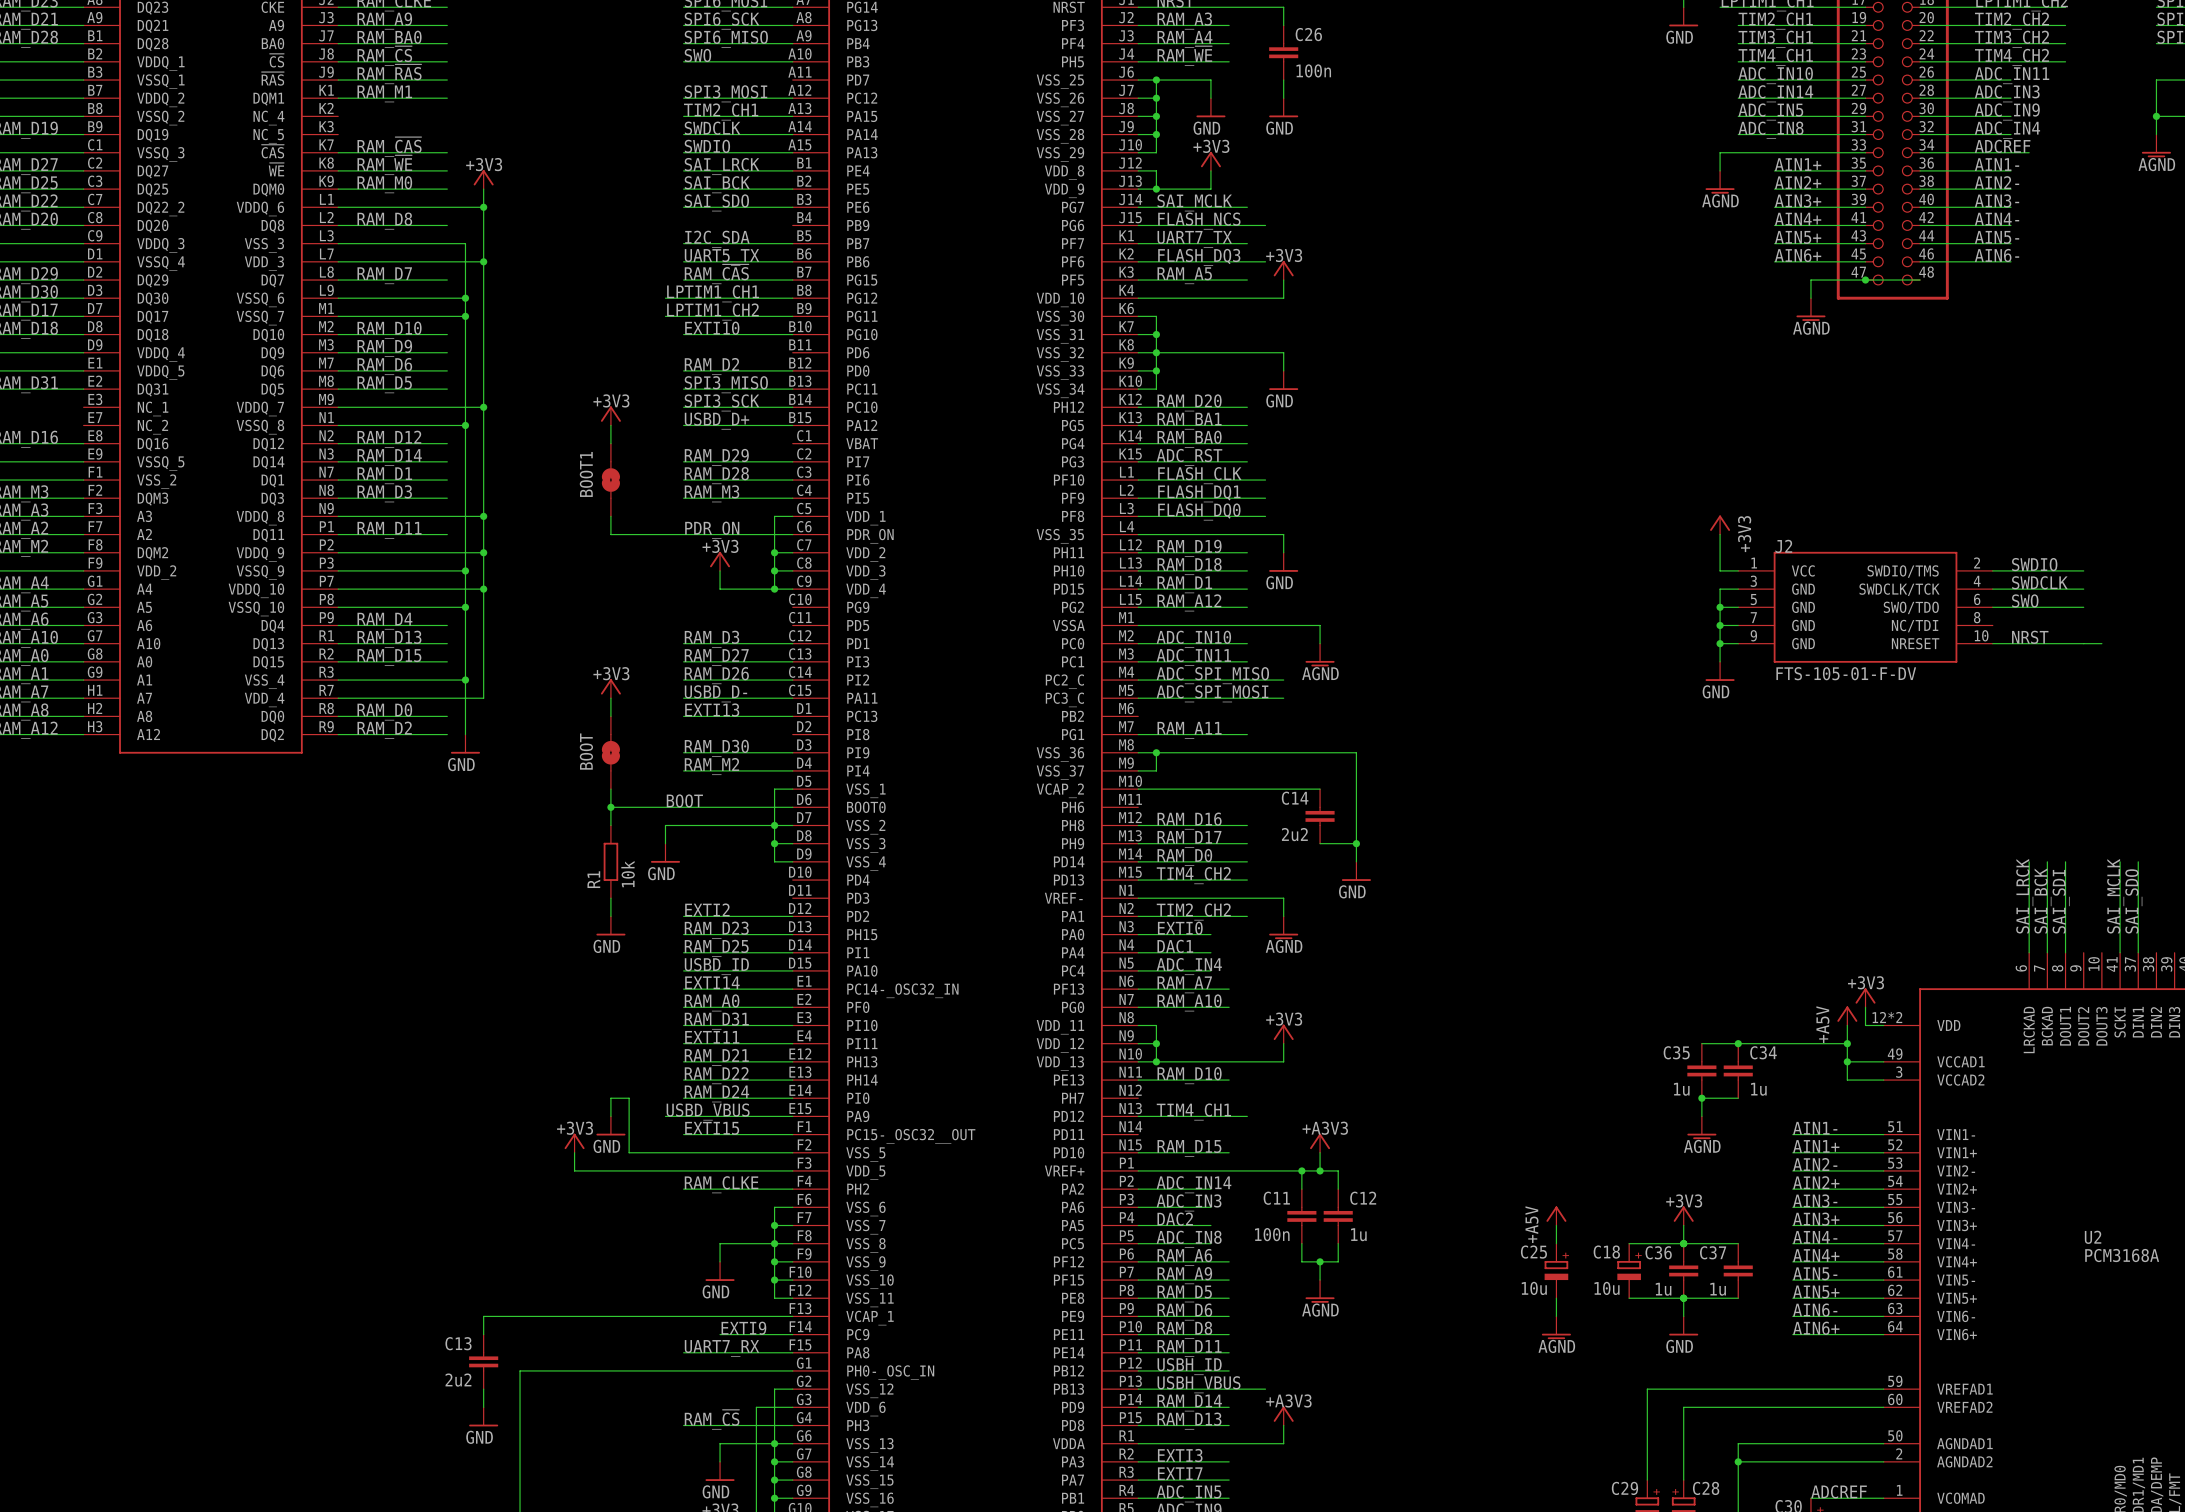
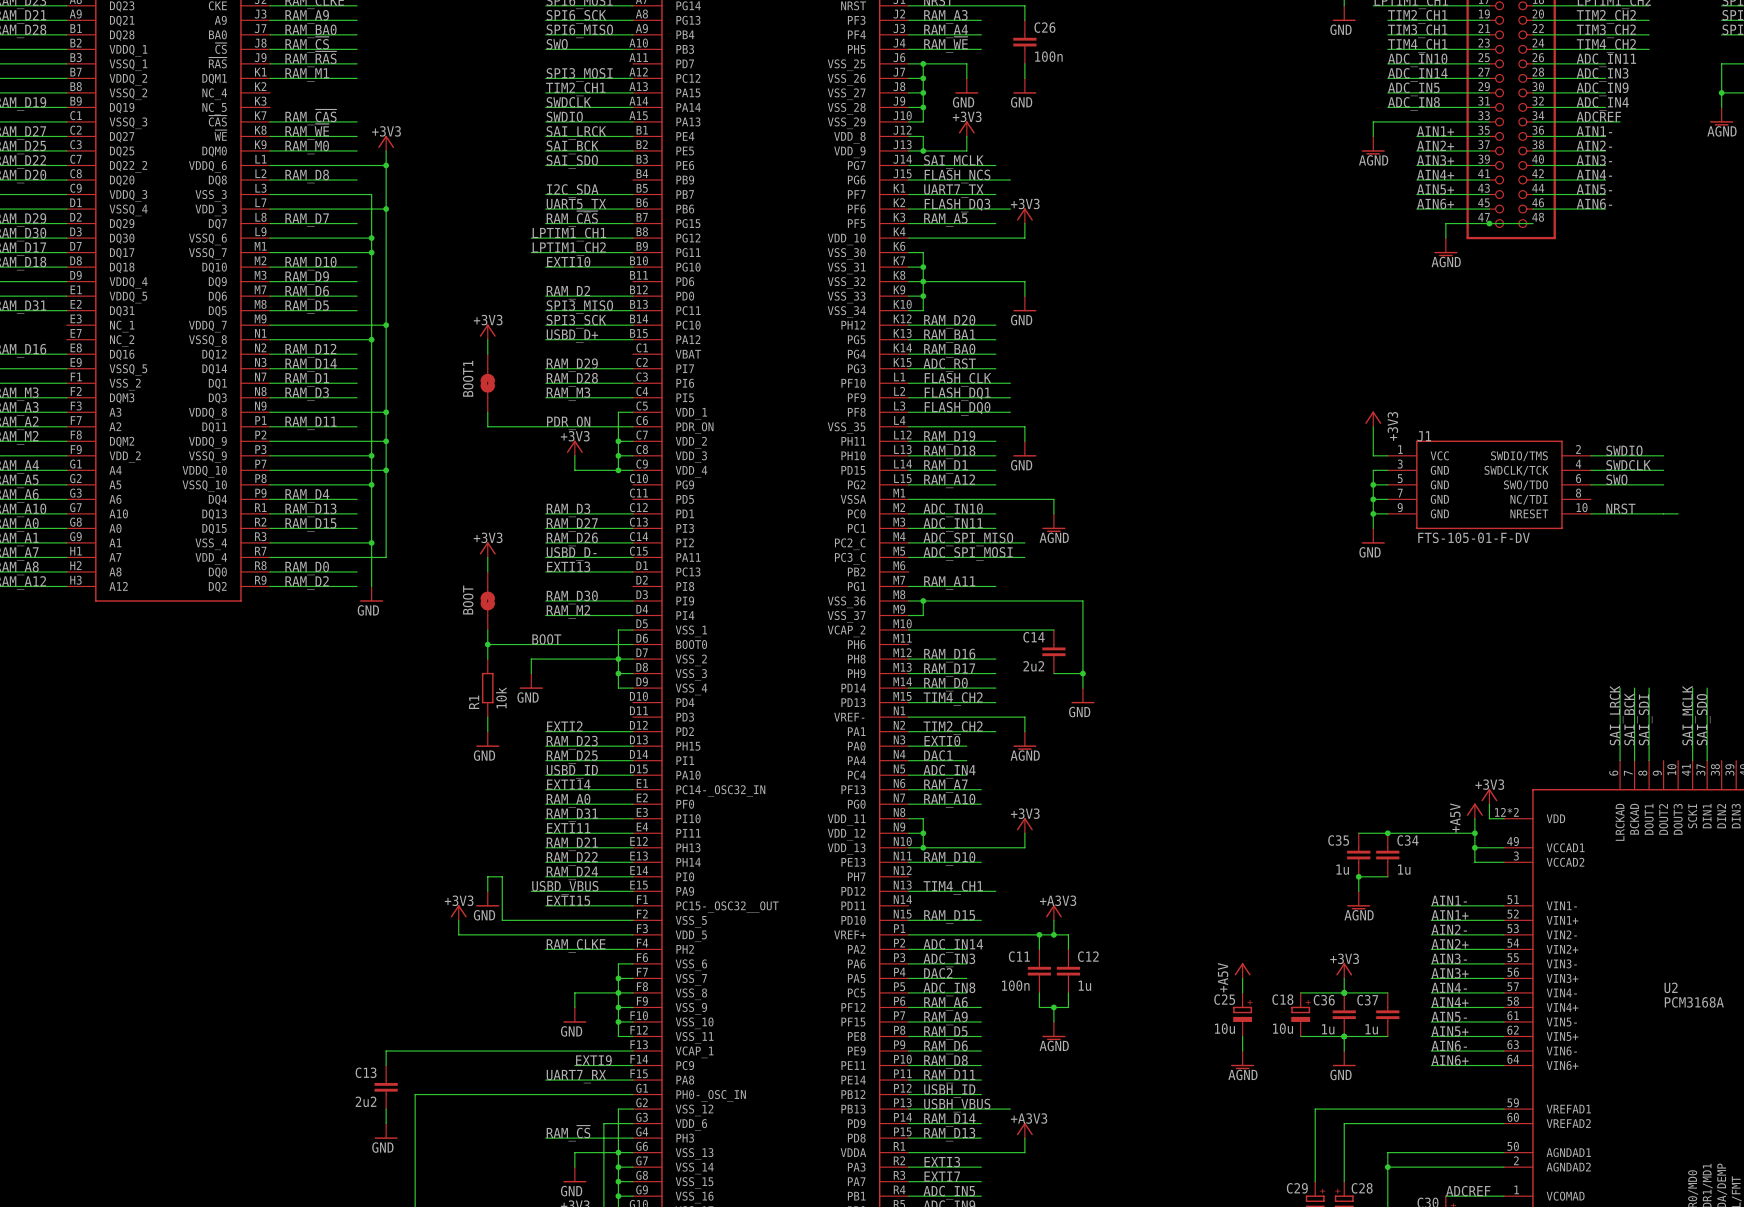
J2 name: J2 (1783, 546) -> J1 (1424, 436)

